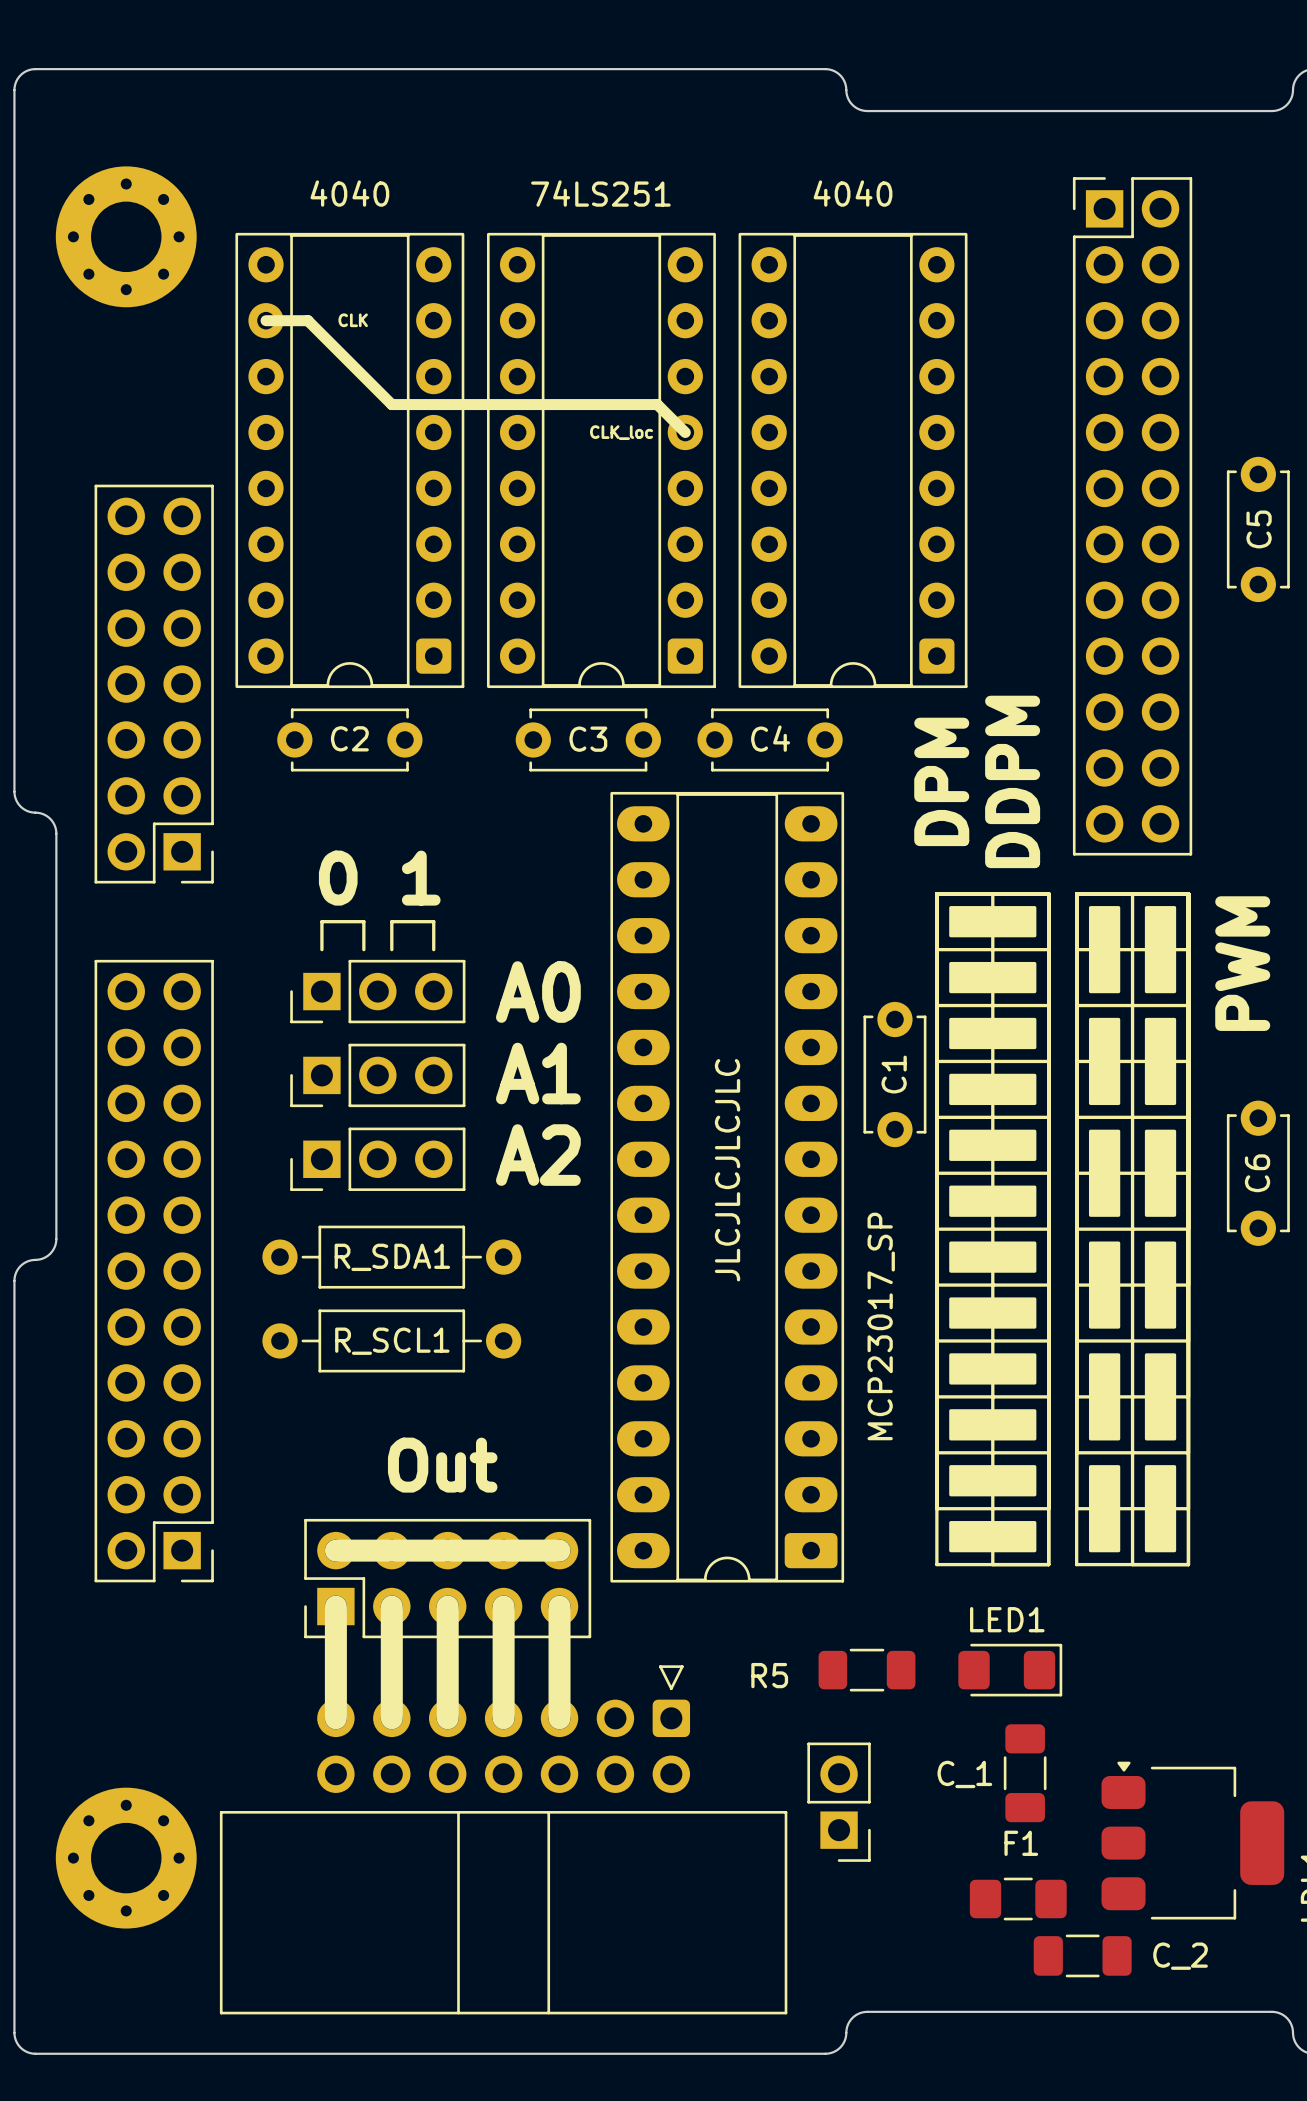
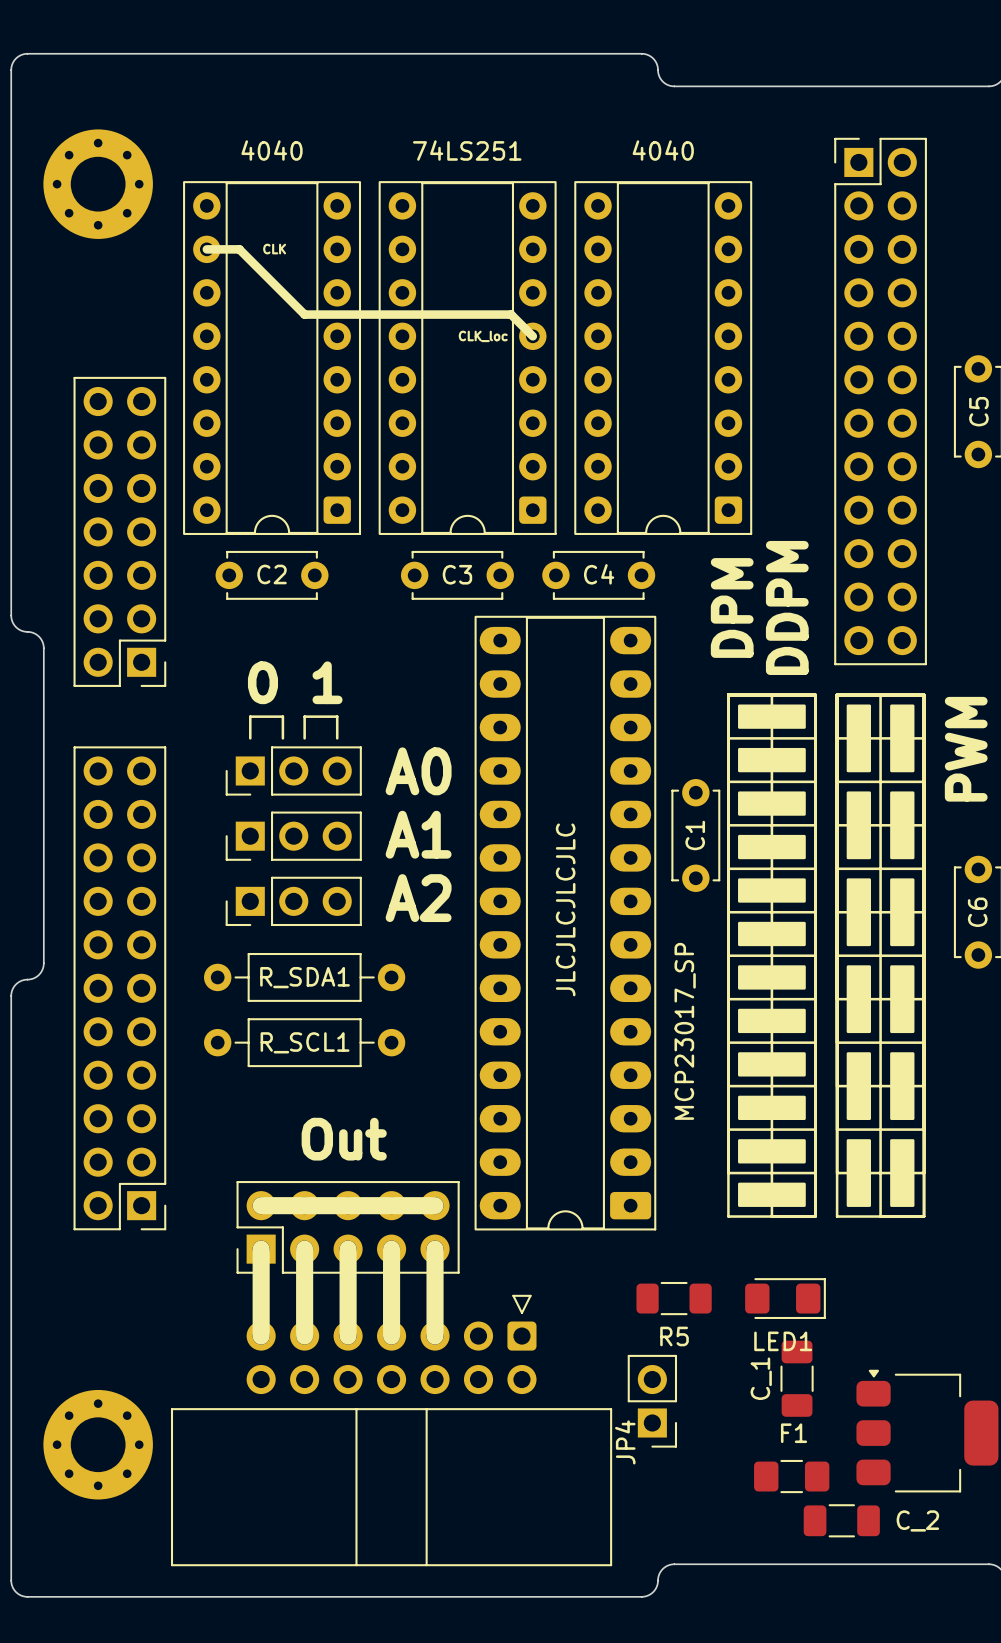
LED1 name position: LED1 (1007, 1619) -> LED1 (783, 1341)
R5 name position: R5 (769, 1675) -> R5 (674, 1336)
C_1 name rotation: 0° (964, 1774) -> 90° counterclockwise (761, 1378)
JP4 name: none -> JP4 (625, 1442)

